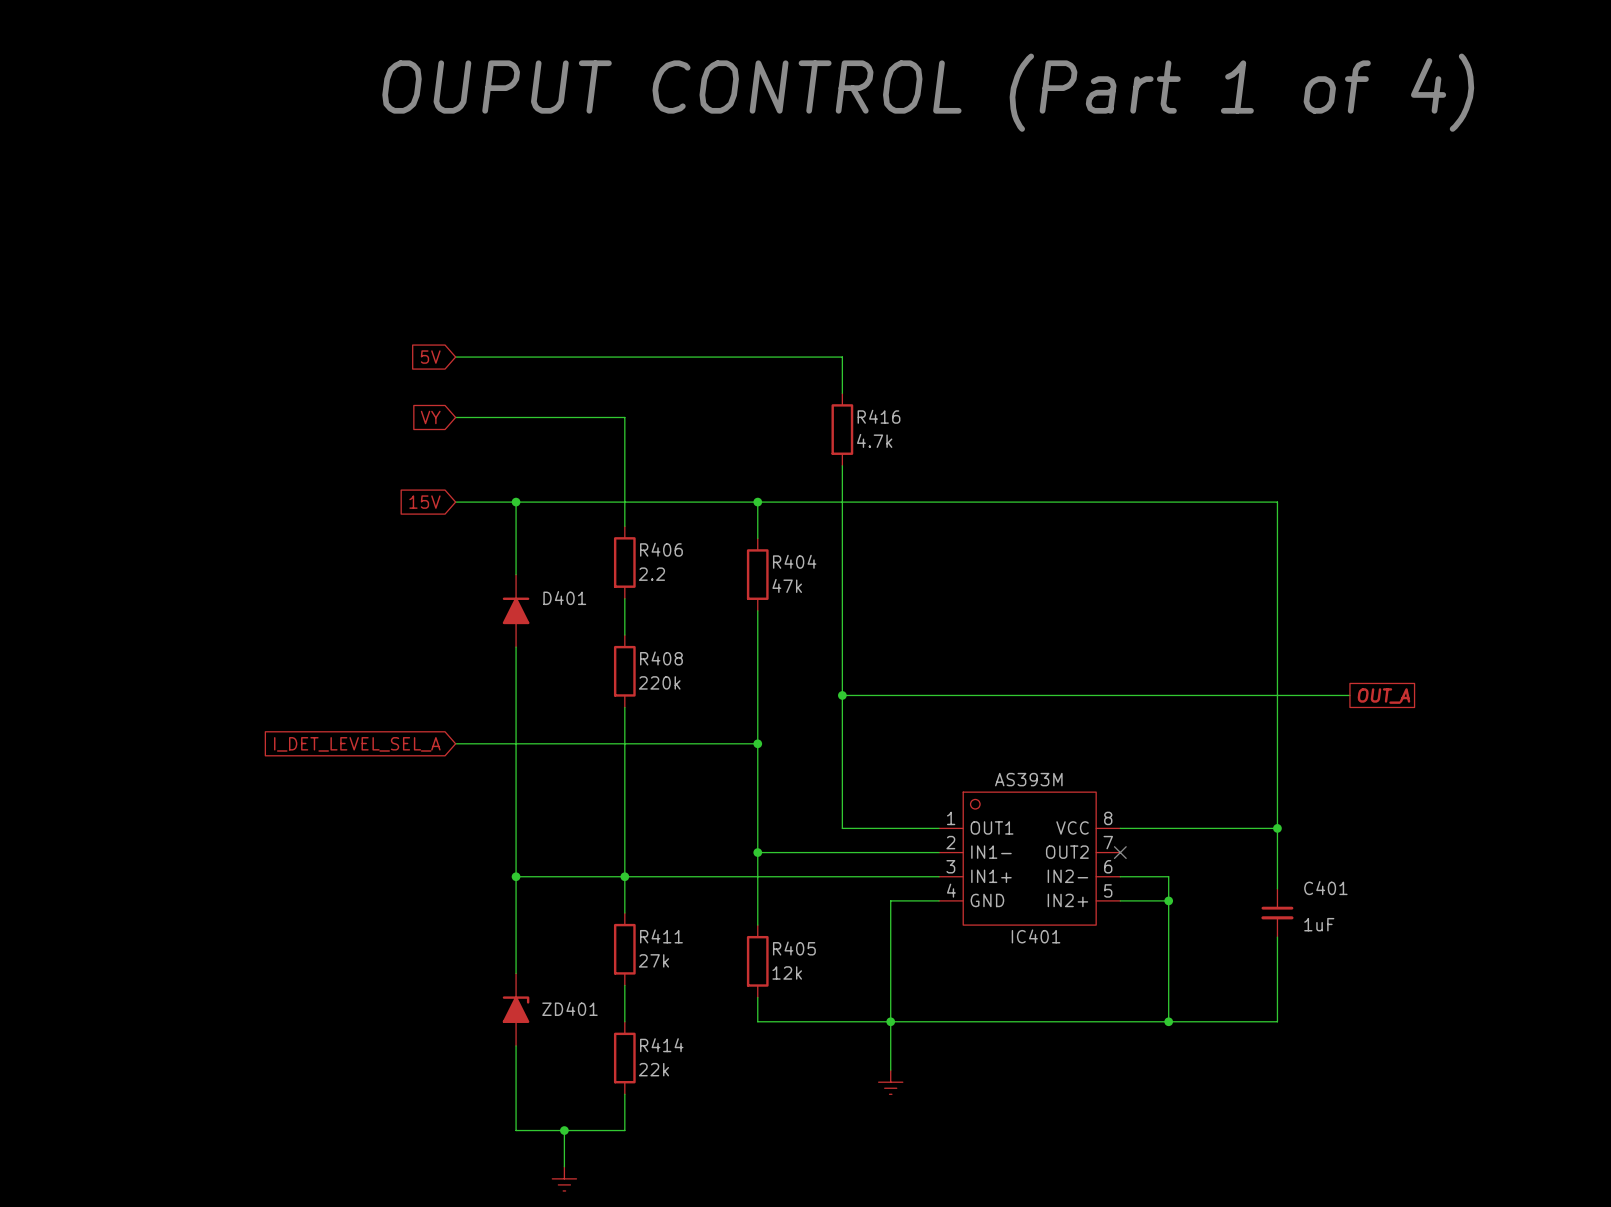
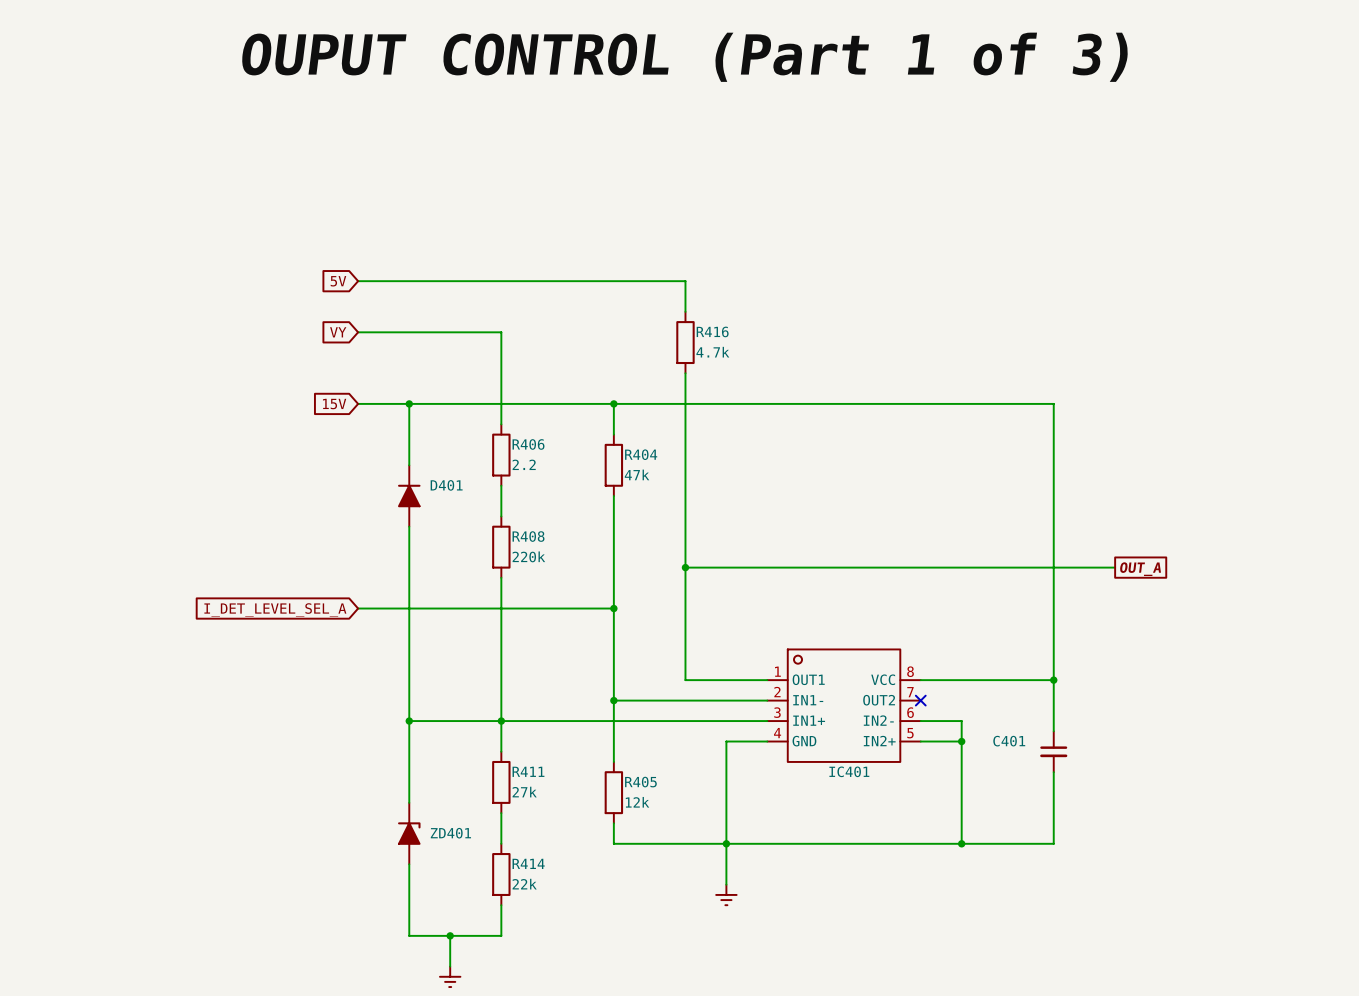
text: OUPUT CONTROL (Part 1 of 4) (928, 92) -> none
label: none -> OUPUT CONTROL (Part 1 of 3) (684, 57)
IC401 value: AS393M (1028, 779) -> none
C401 name position: C401 (1325, 888) -> C401 (1009, 741)
C401 value: 1uF (1319, 924) -> none

